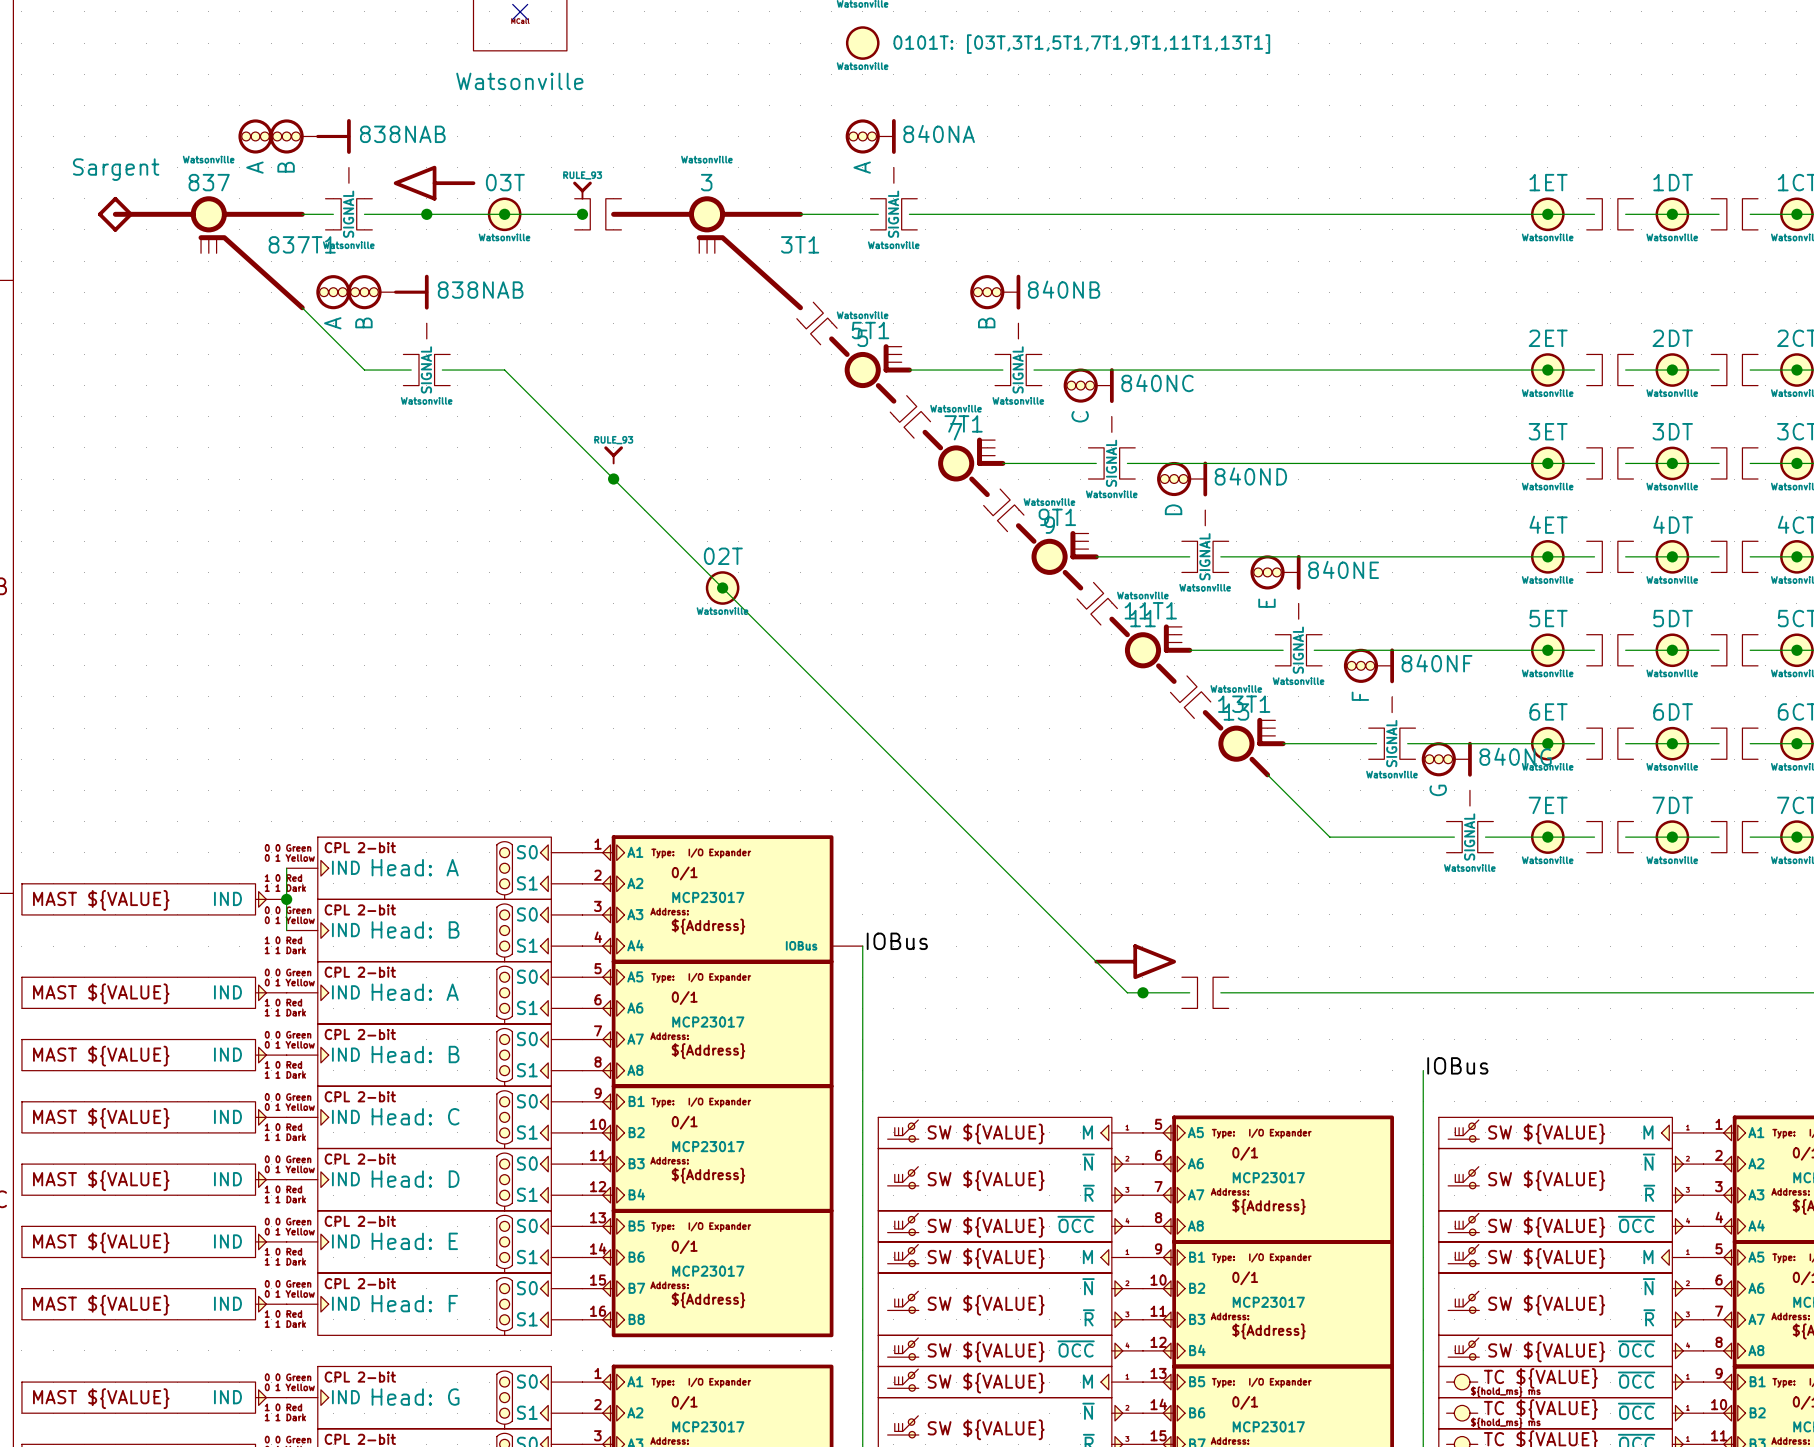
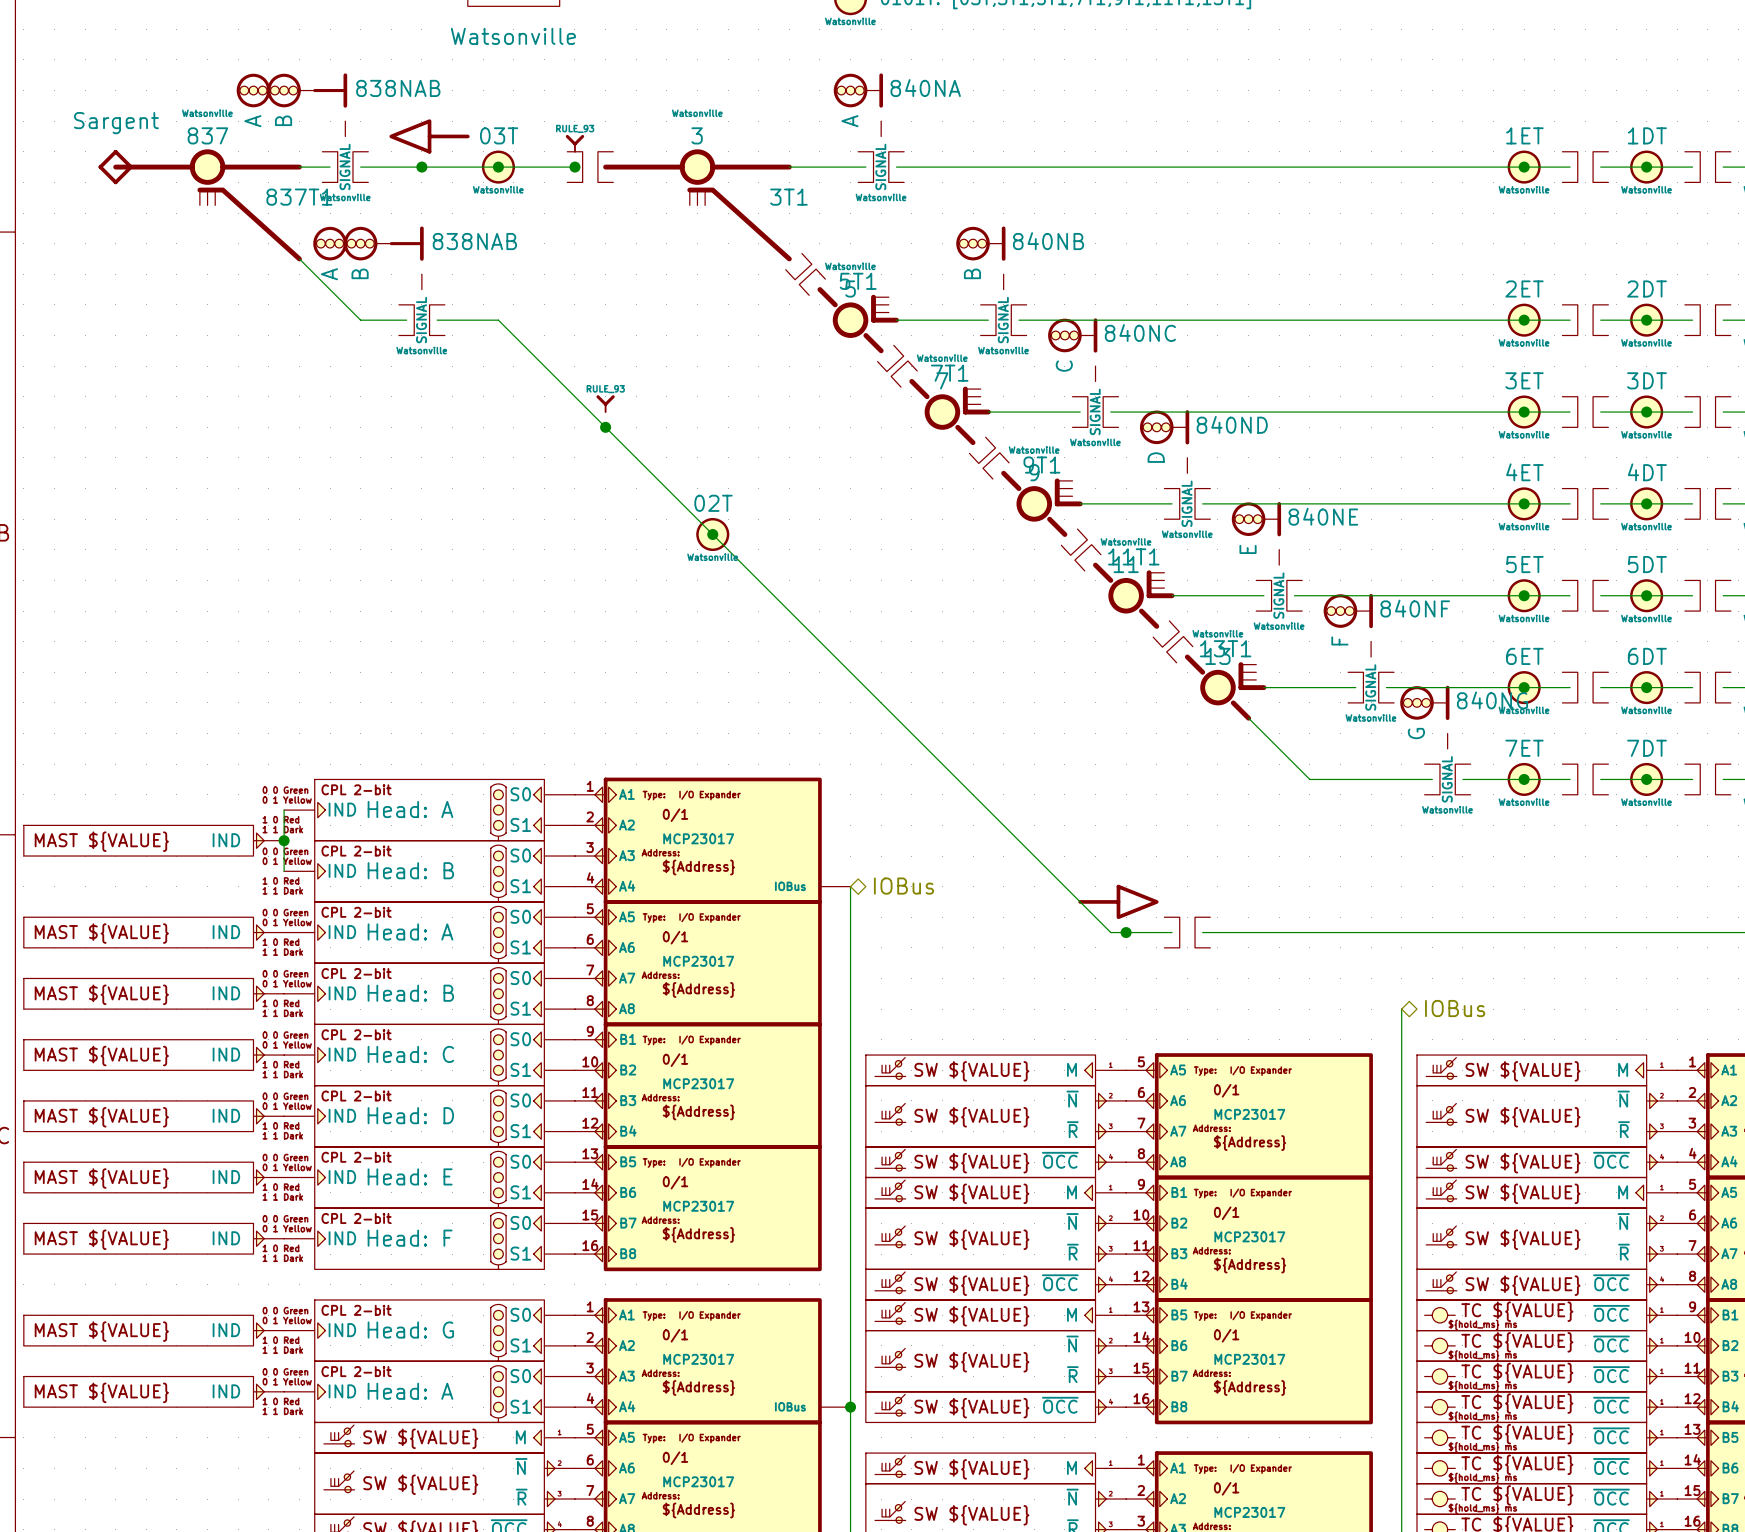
label: IOBus (897, 941) -> none
hierarchical label: none -> IOBus (904, 886)
label: IOBus (1457, 1065) -> none
hierarchical label: none -> IOBus (1455, 1008)

